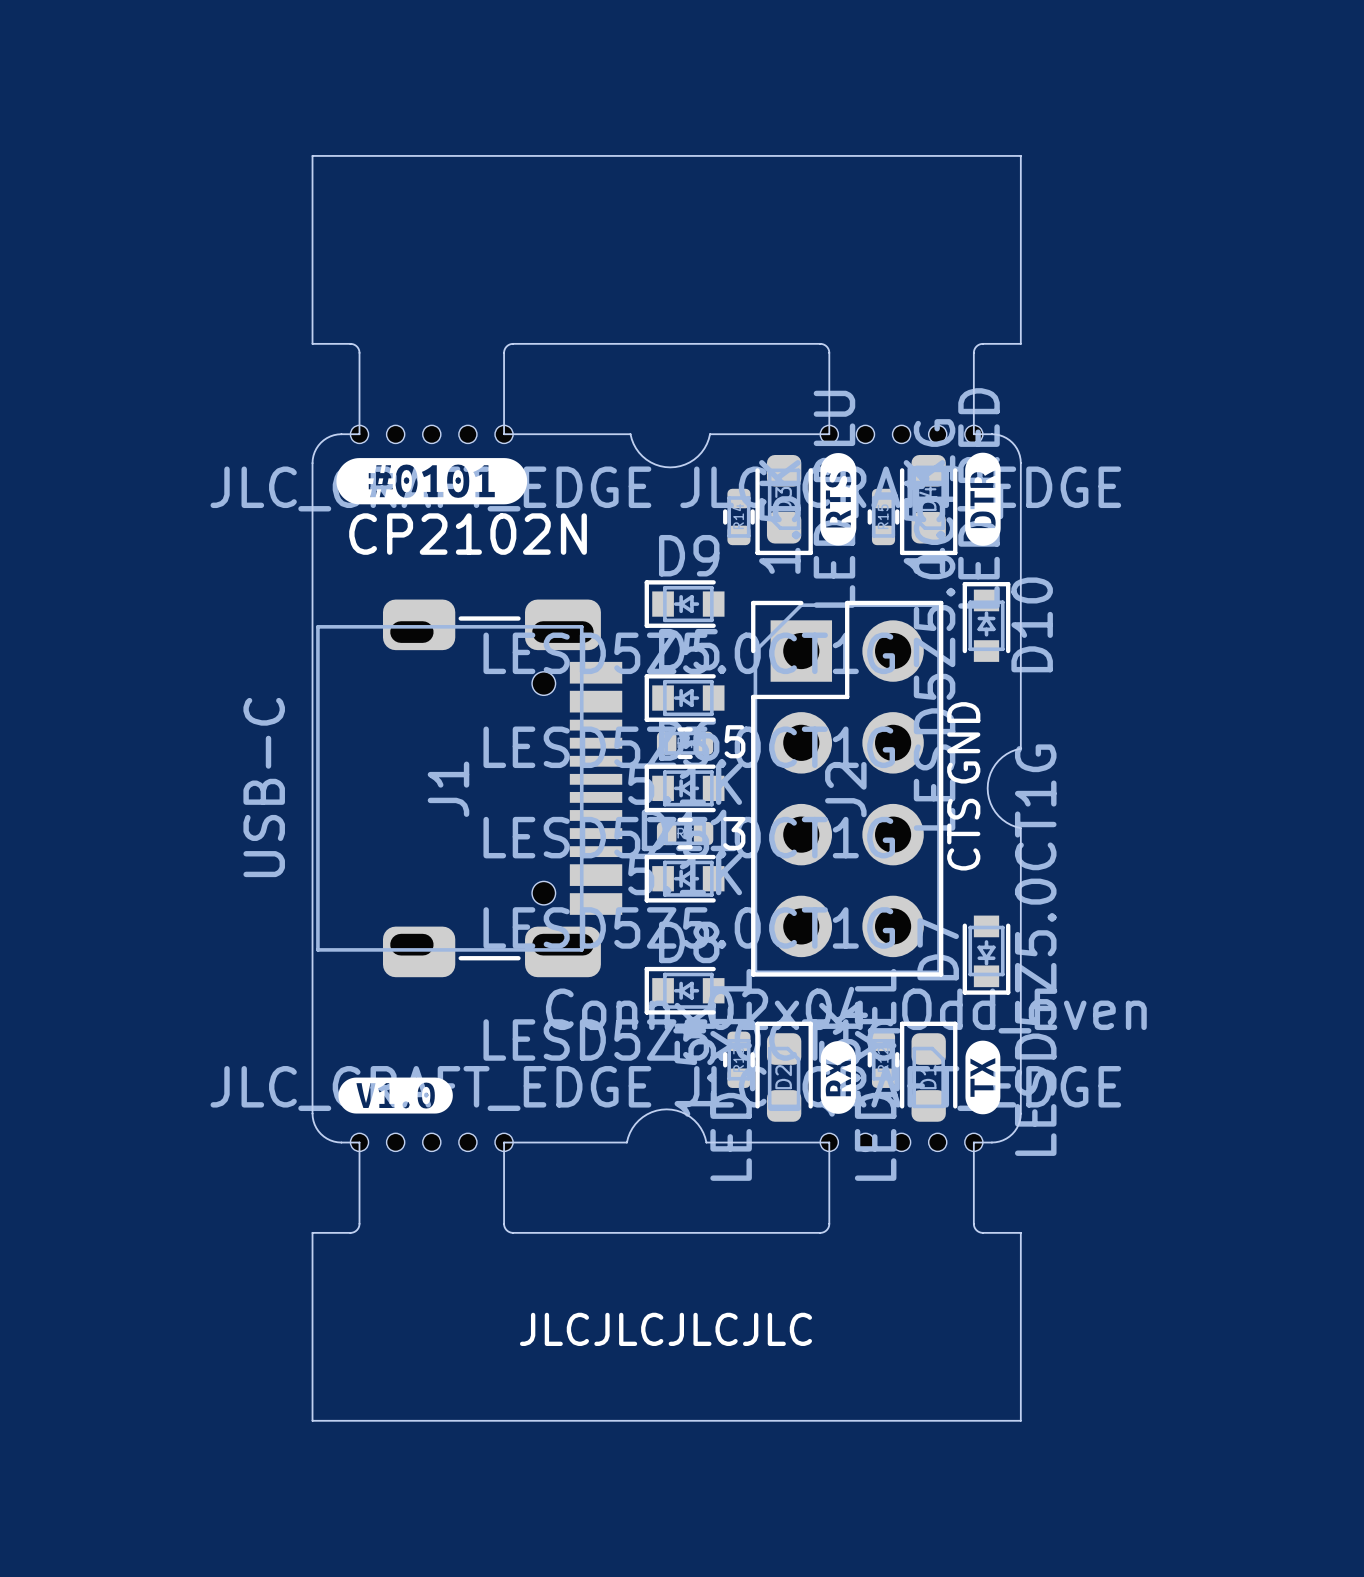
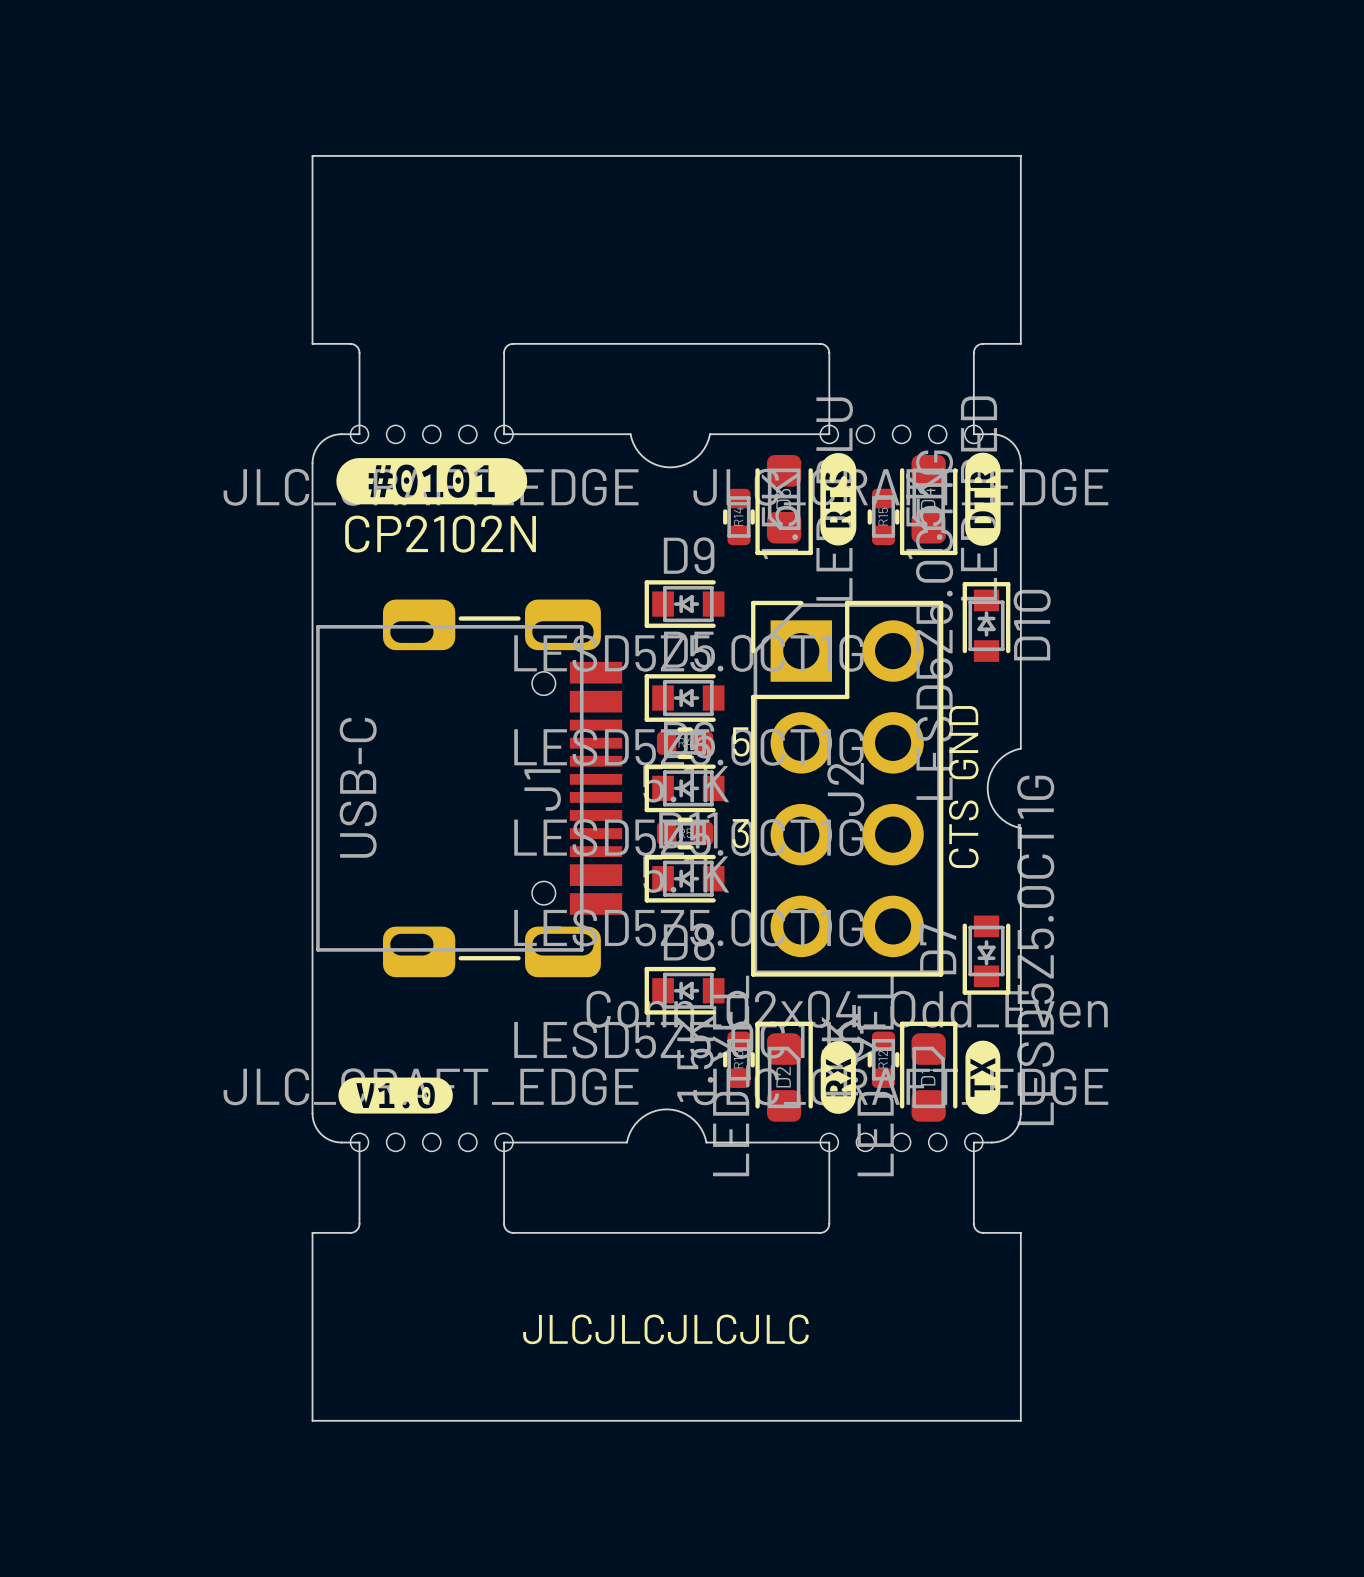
J1 value position: USB-C (264, 787) -> USB-C (358, 787)
J1 name position: J1 (448, 789) -> J1 (542, 790)

